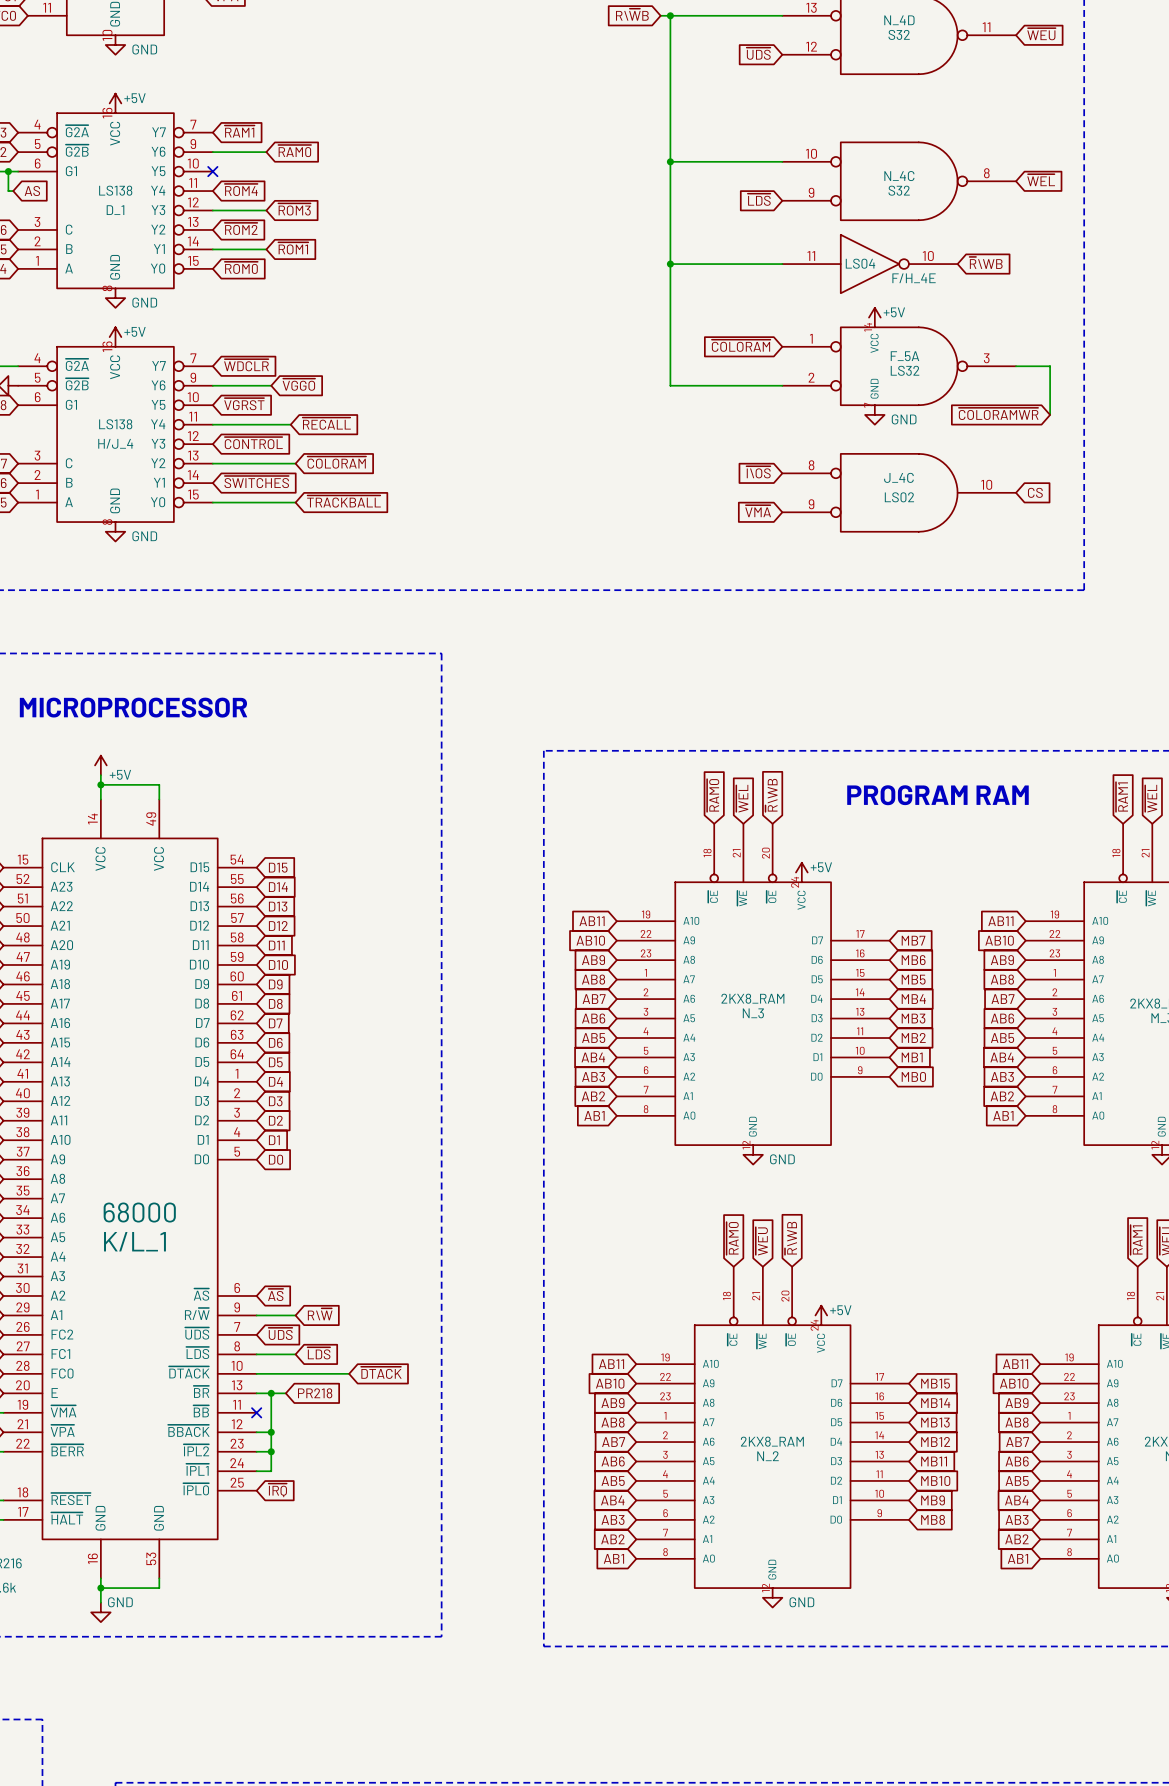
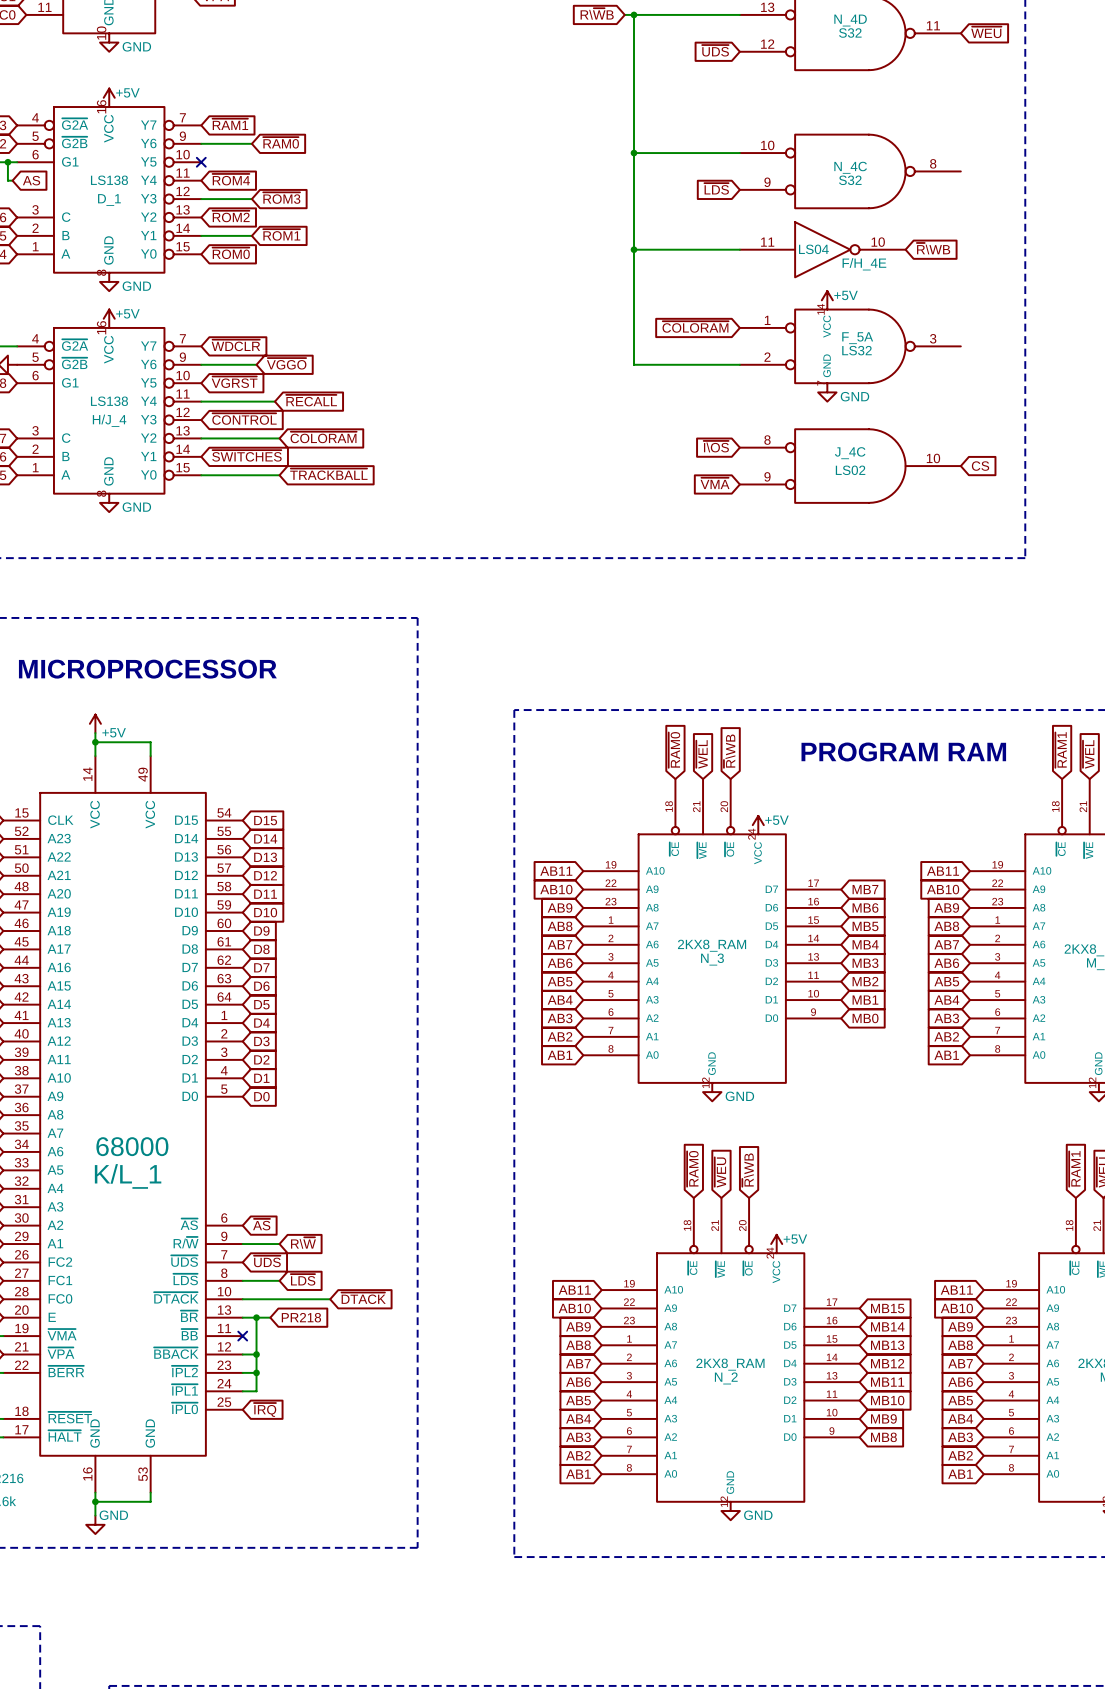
global label: ~{WEL} (1041, 180) -> none
wire: (1016, 366) (1050, 366) (1050, 414) -> none
global label: ~{COLORAMWR} (998, 413) -> none

